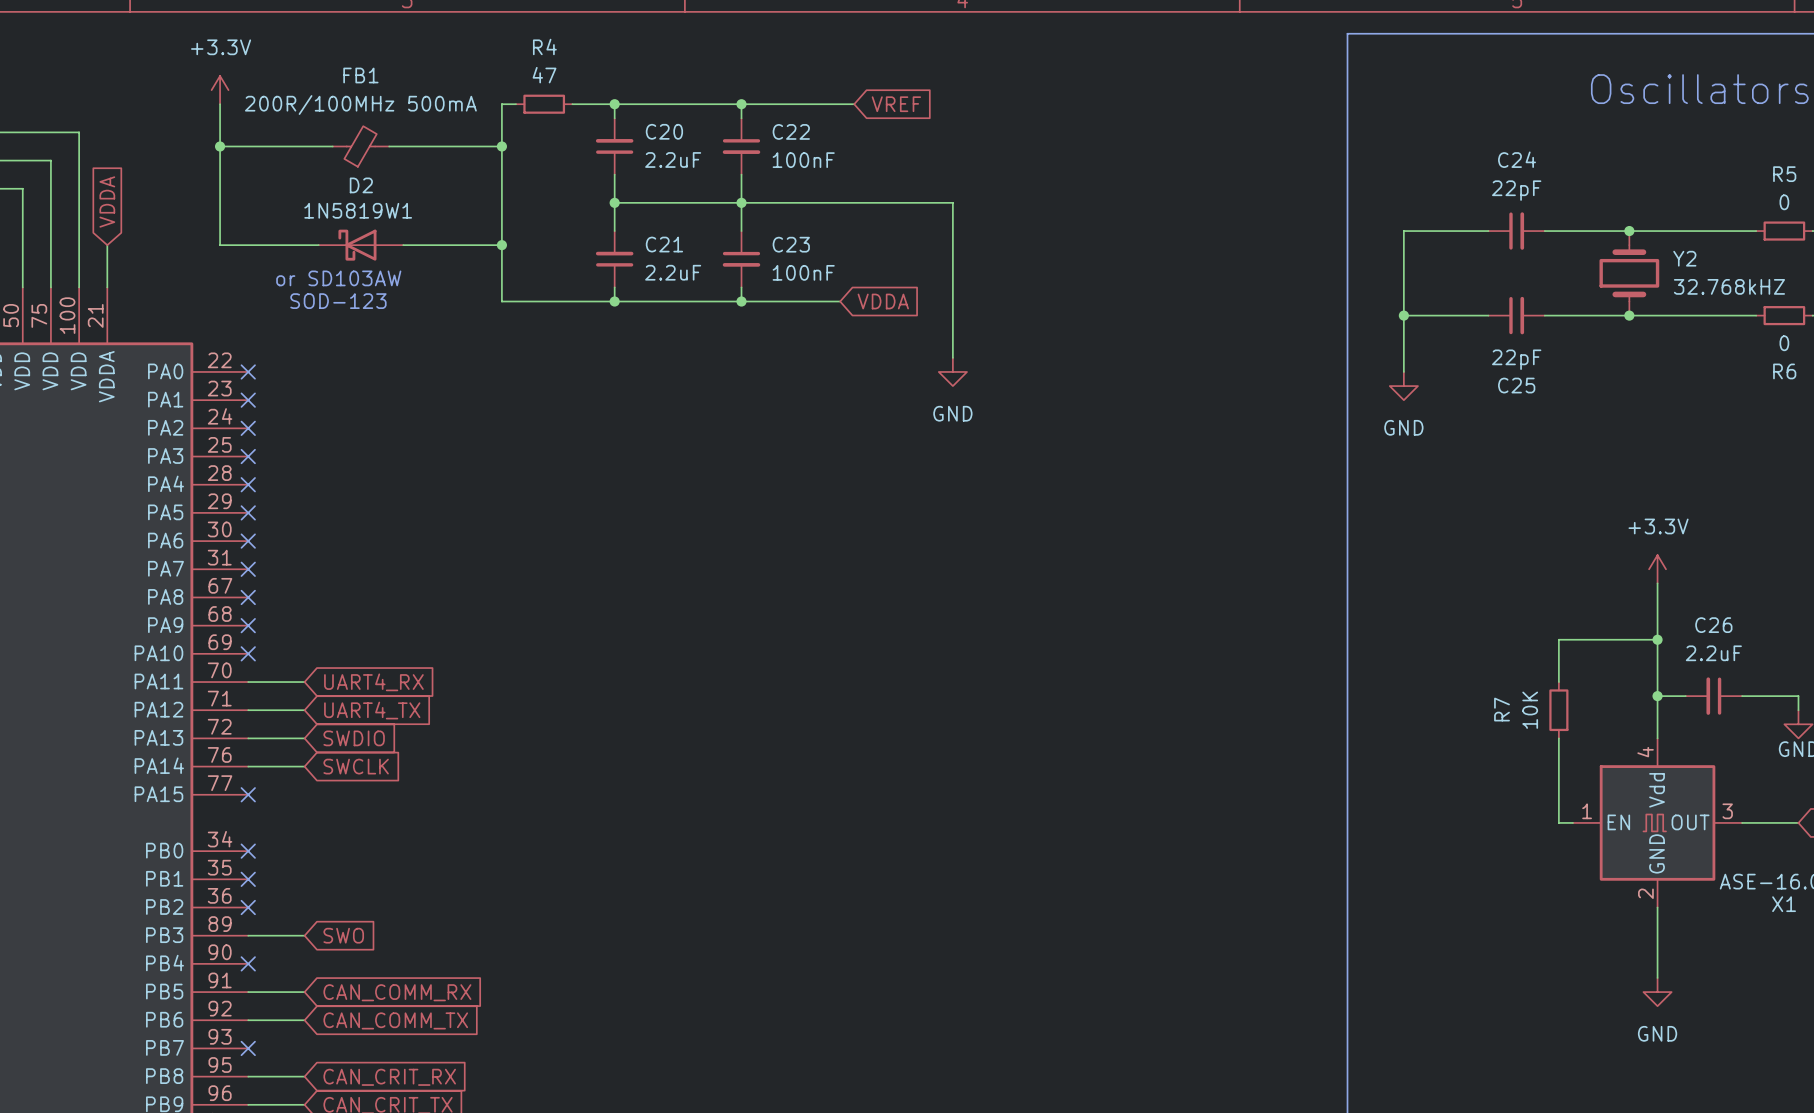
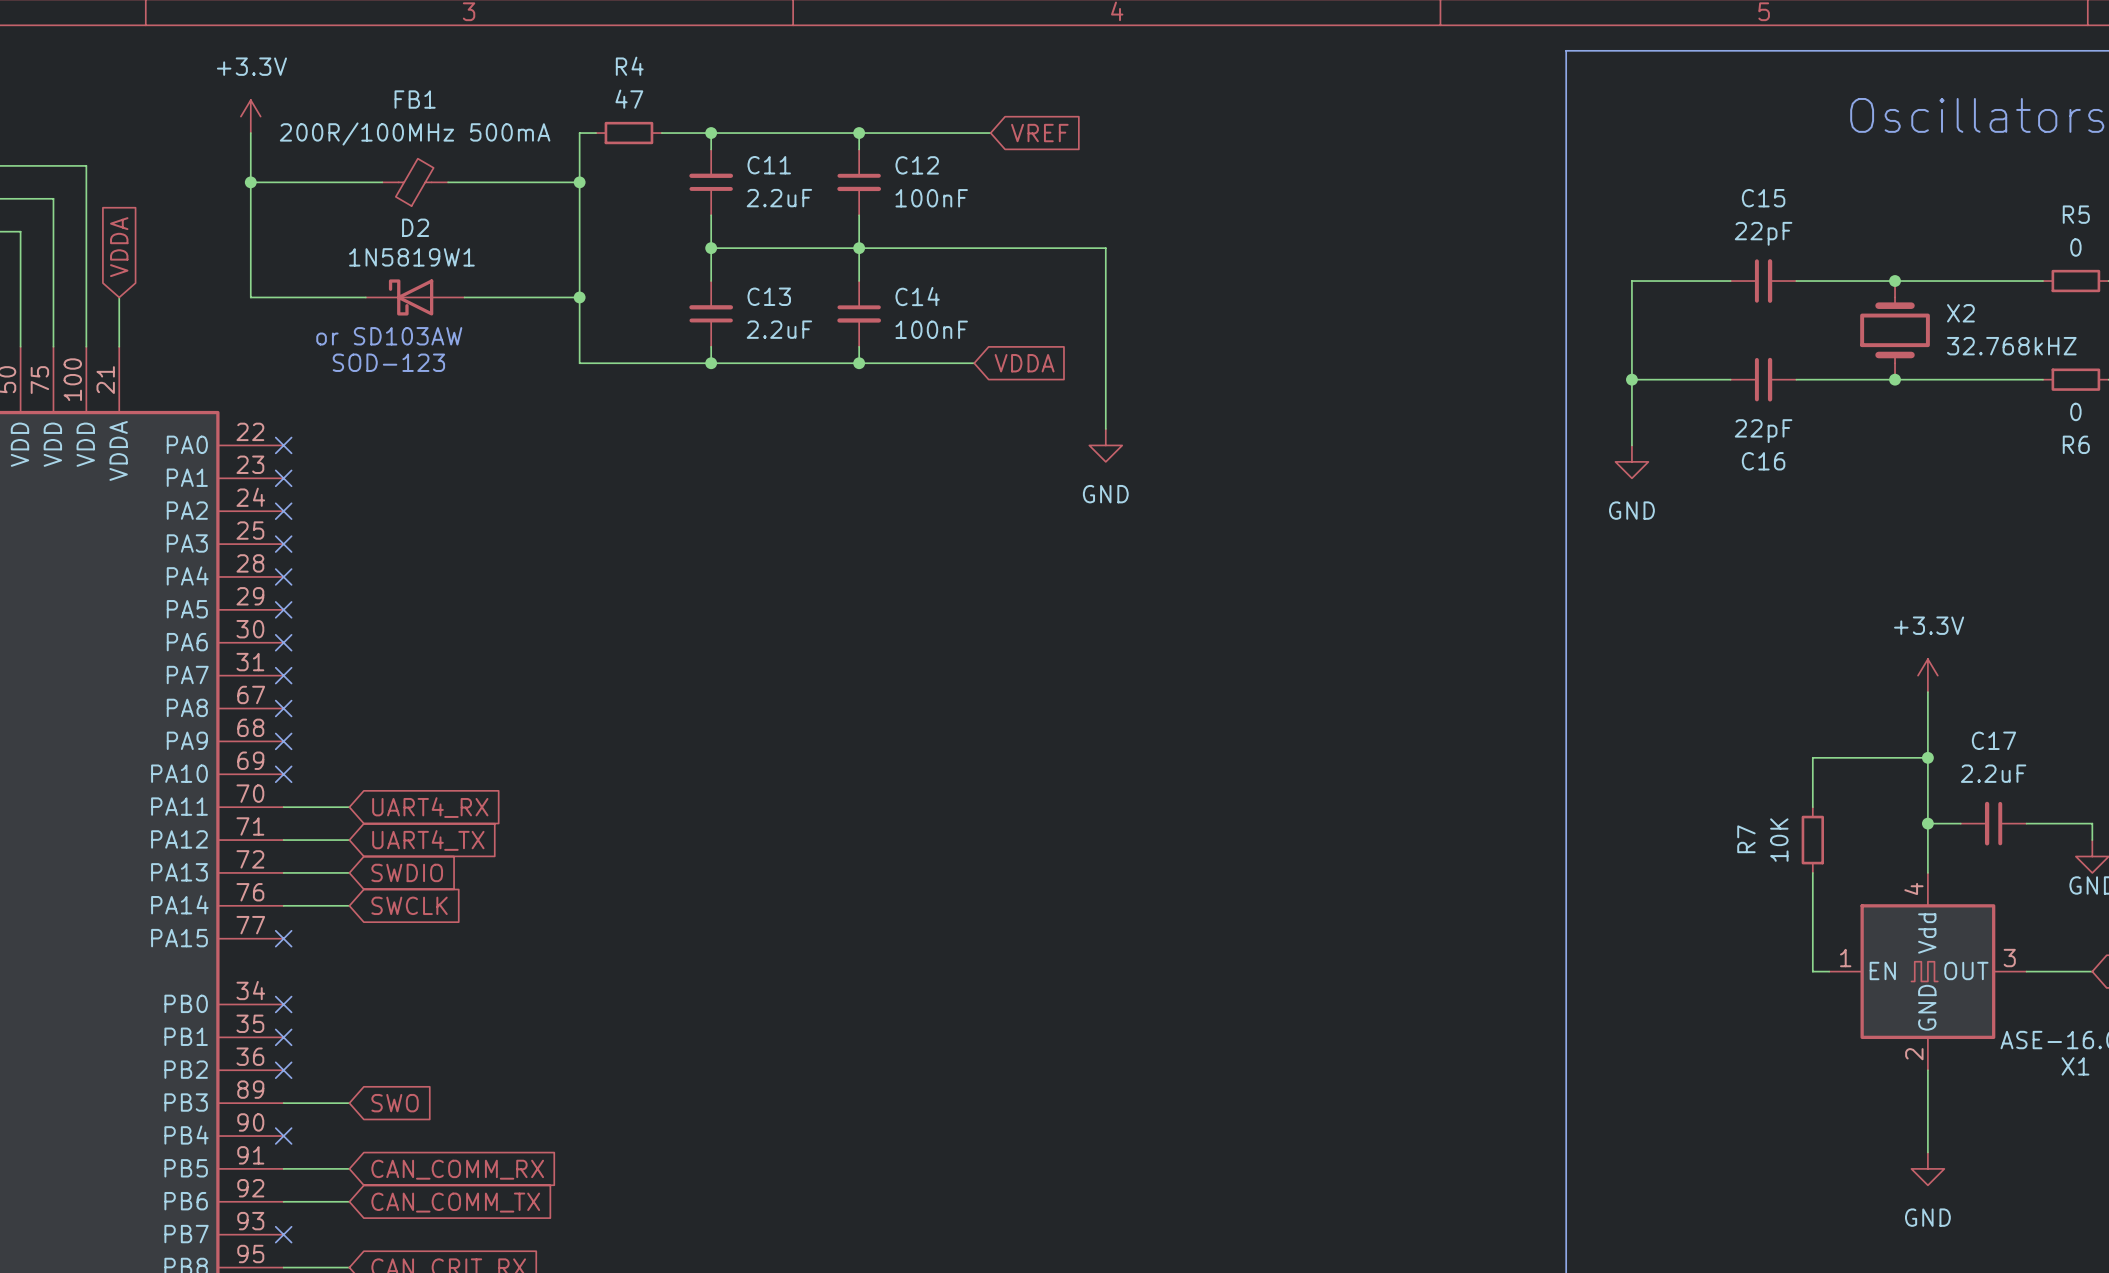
C20 name: C20 (664, 131) -> C11 (769, 165)
C22 name: C22 (791, 131) -> C12 (917, 165)
C24 name: C24 (1517, 159) -> C15 (1763, 198)
C21 name: C21 (664, 244) -> C13 (769, 296)
C23 name: C23 (791, 244) -> C14 (917, 296)
Y2 name: Y2 (1684, 258) -> X2 (1960, 313)
C25 name: C25 (1516, 385) -> C16 (1763, 461)
C26 name: C26 (1713, 625) -> C17 (1993, 740)

